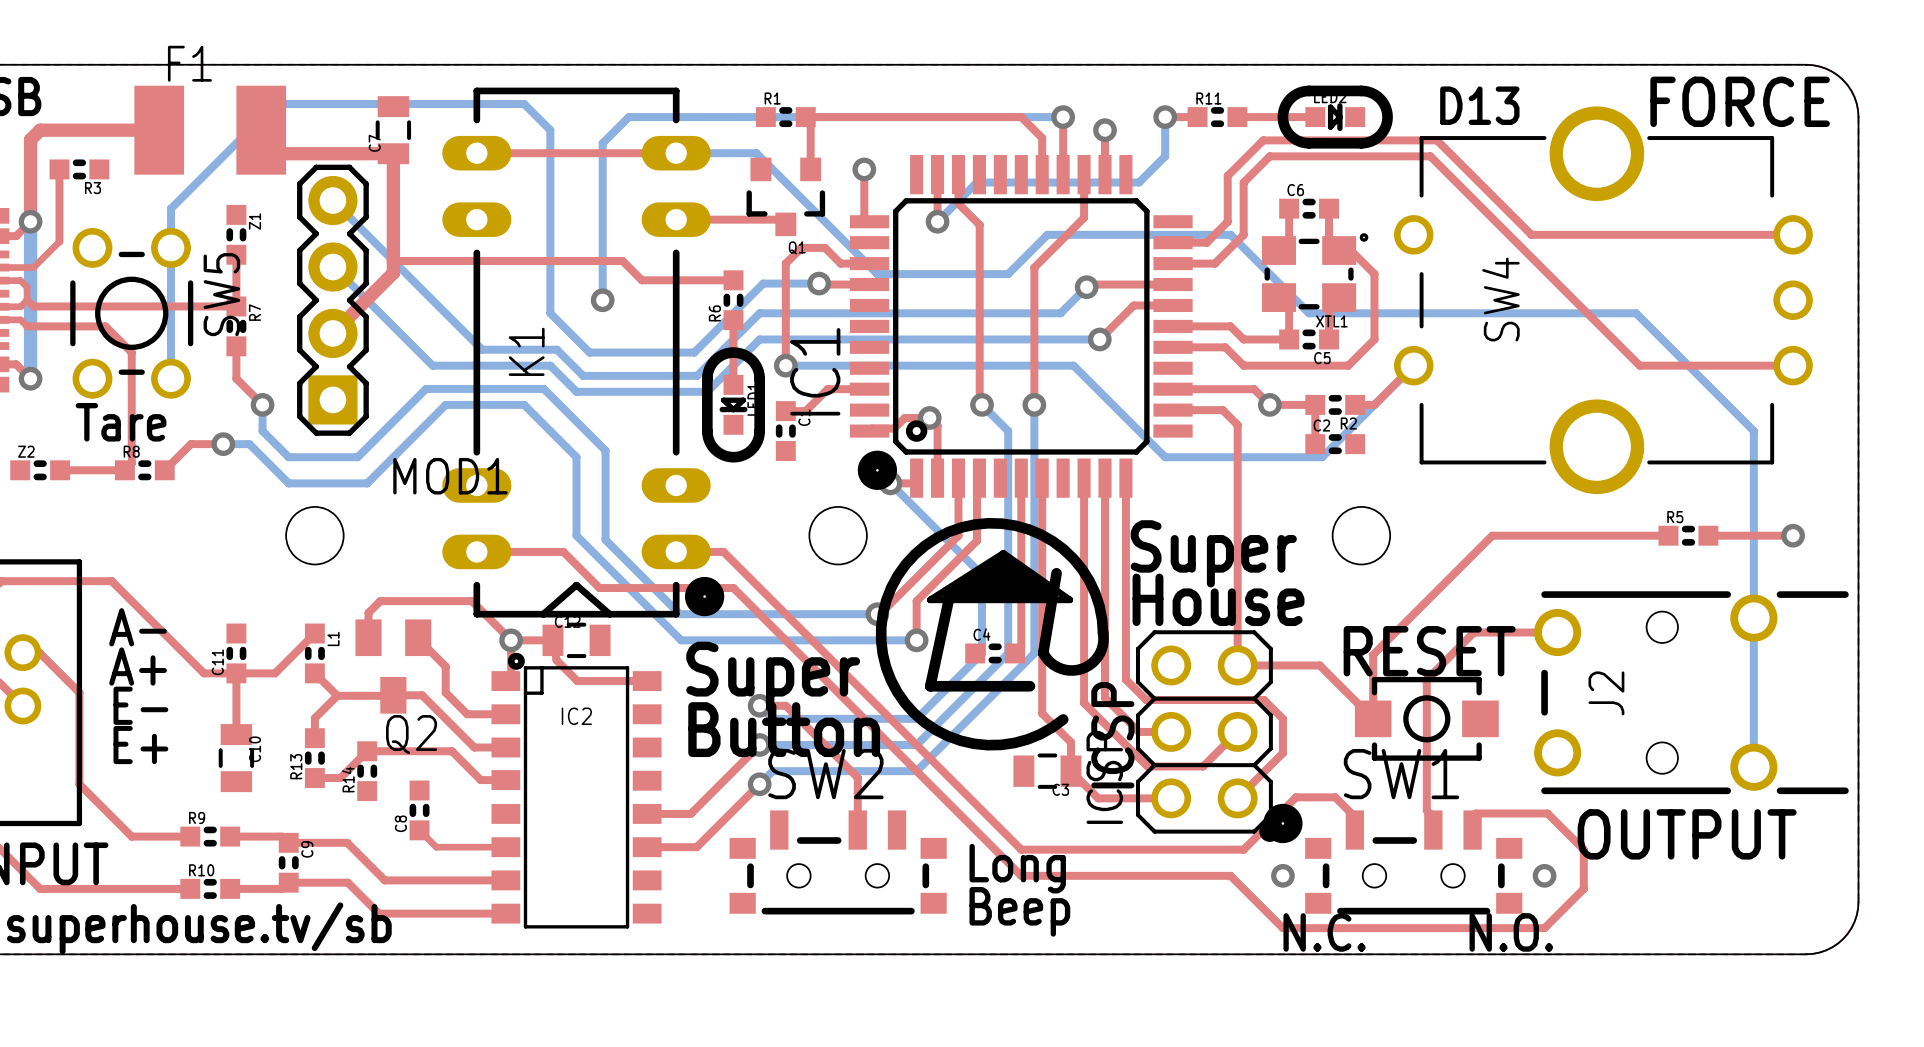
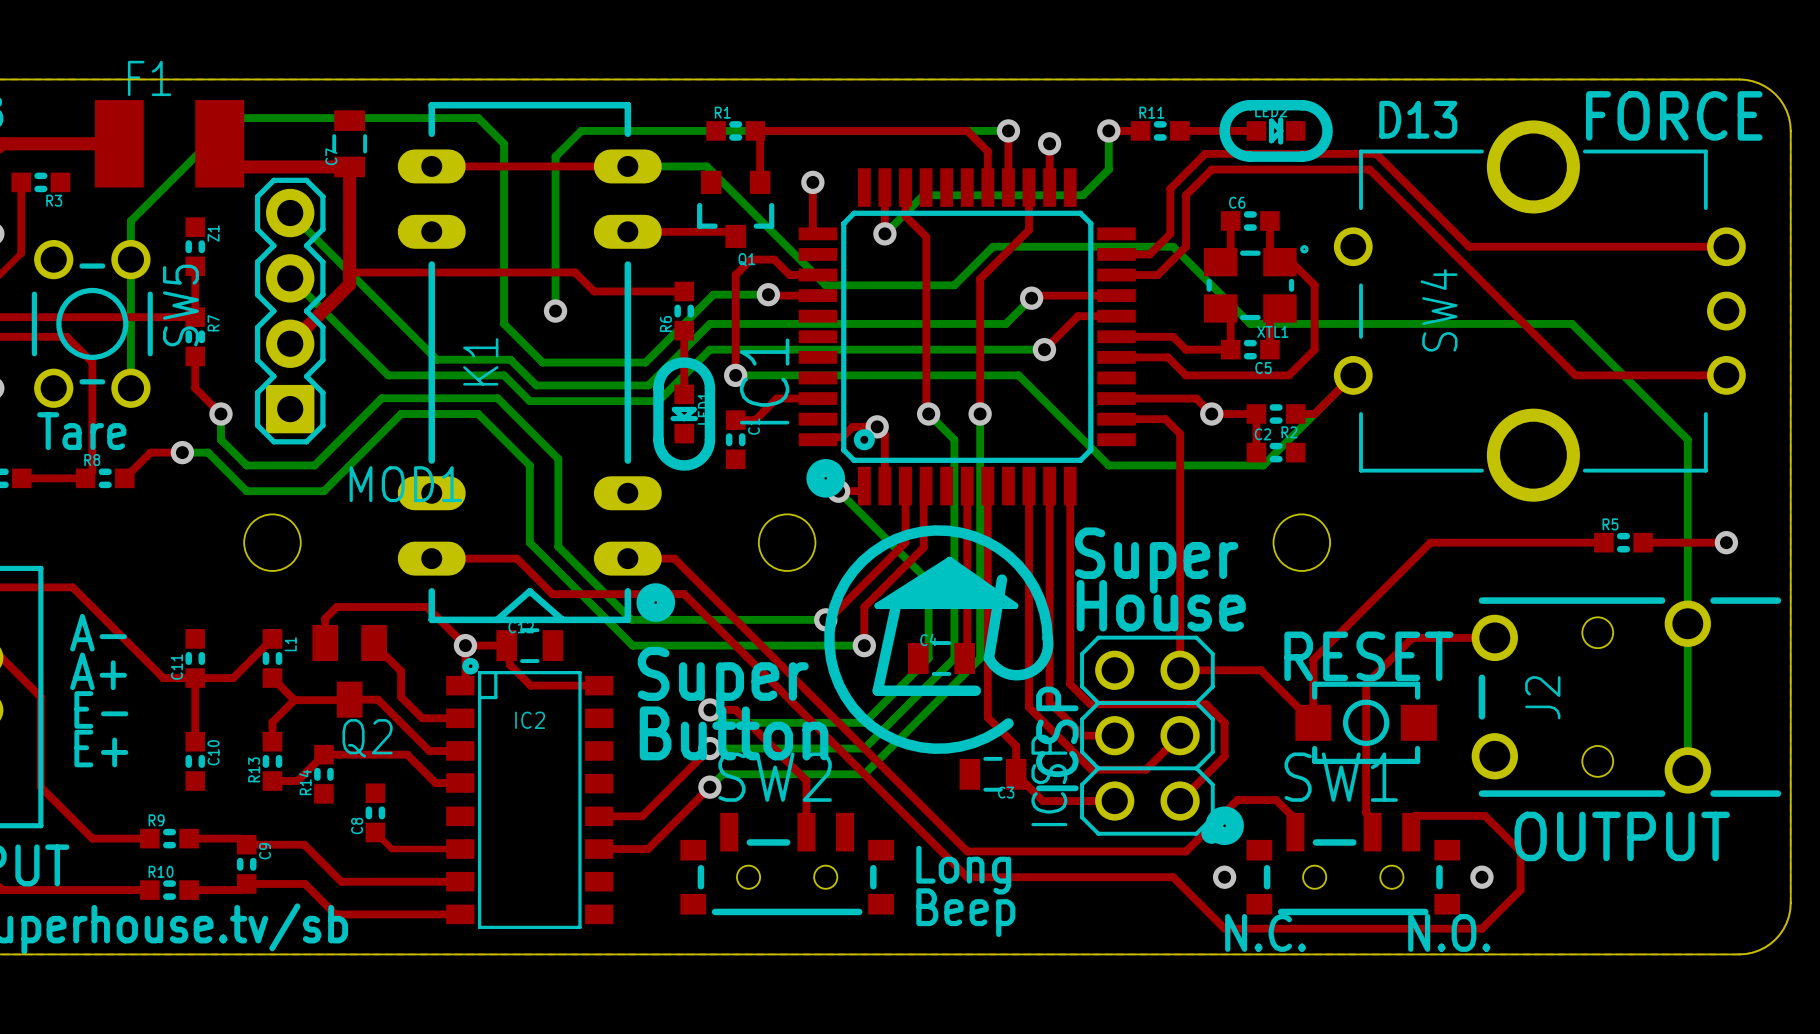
C4 footprint: [965, 643, 1026, 664] -> [908, 641, 975, 676]
C10 footprint: [218, 724, 255, 793] -> [185, 731, 206, 791]

